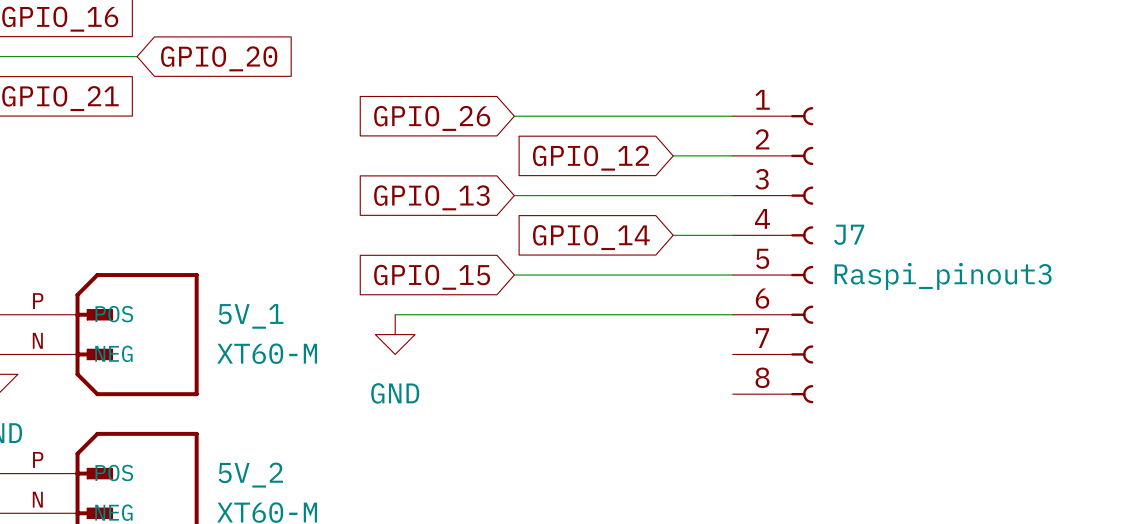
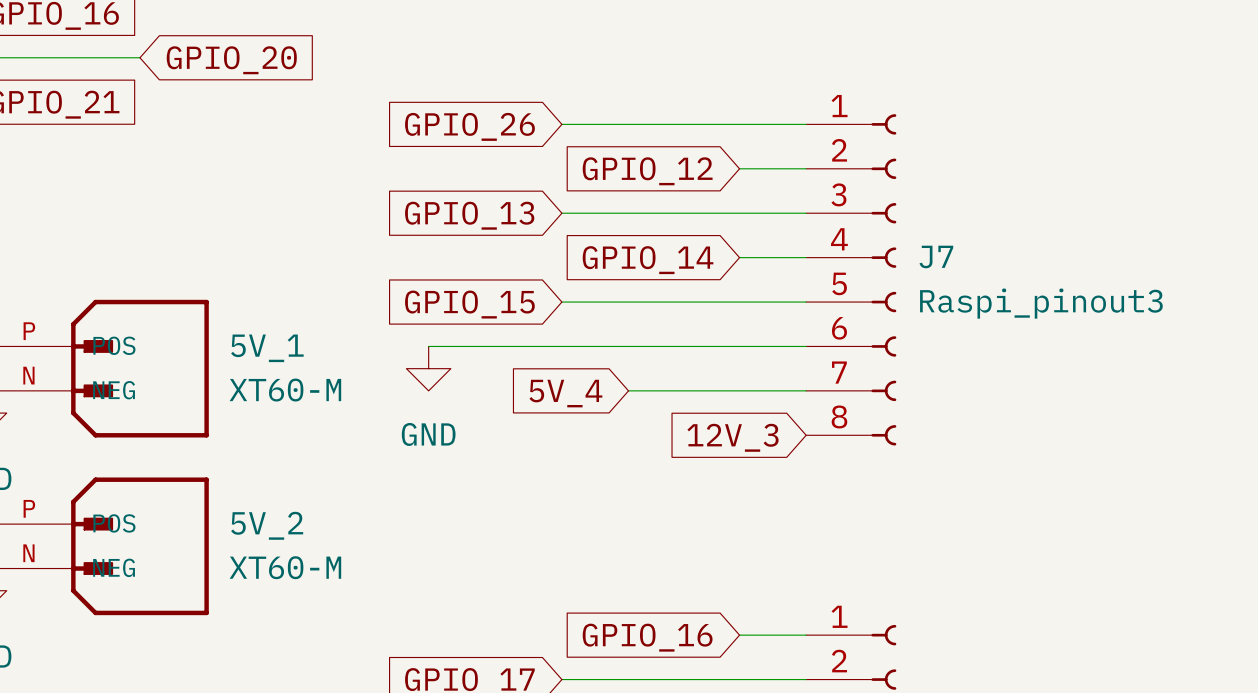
wire: none -> (628, 390) (806, 390)
global label: none -> 5V_4 (565, 393)
global label: none -> 12V_3 (733, 437)

